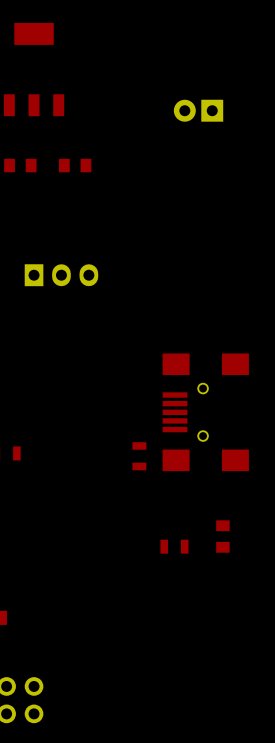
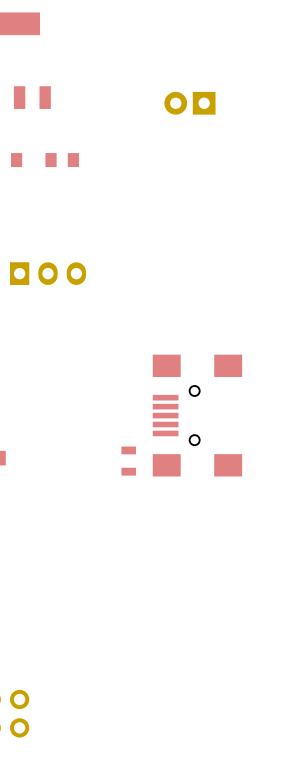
part: (222, 536) -> none
part: (174, 546) -> none

